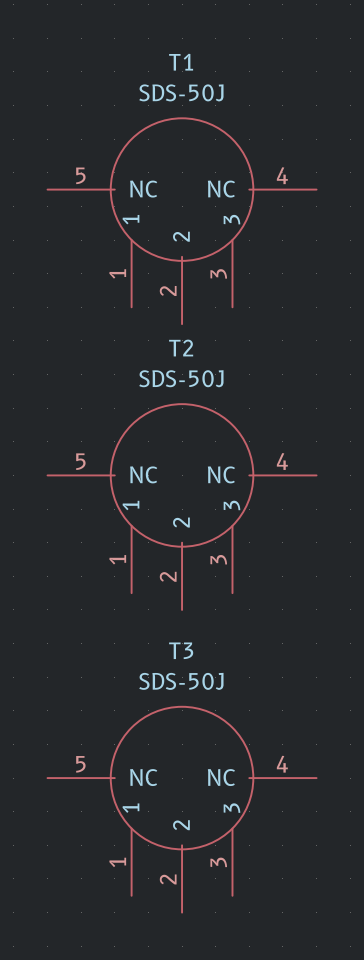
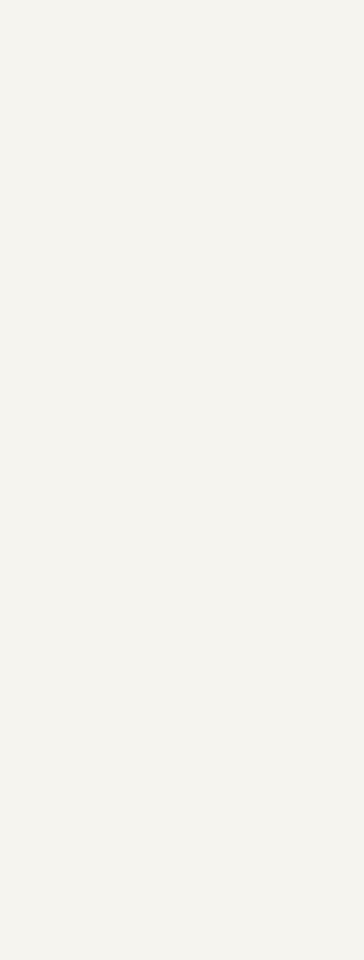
T1: SDS-50J (182, 221) -> none
T2: SDS-50J (182, 507) -> none
T3: SDS-50J (182, 809) -> none

